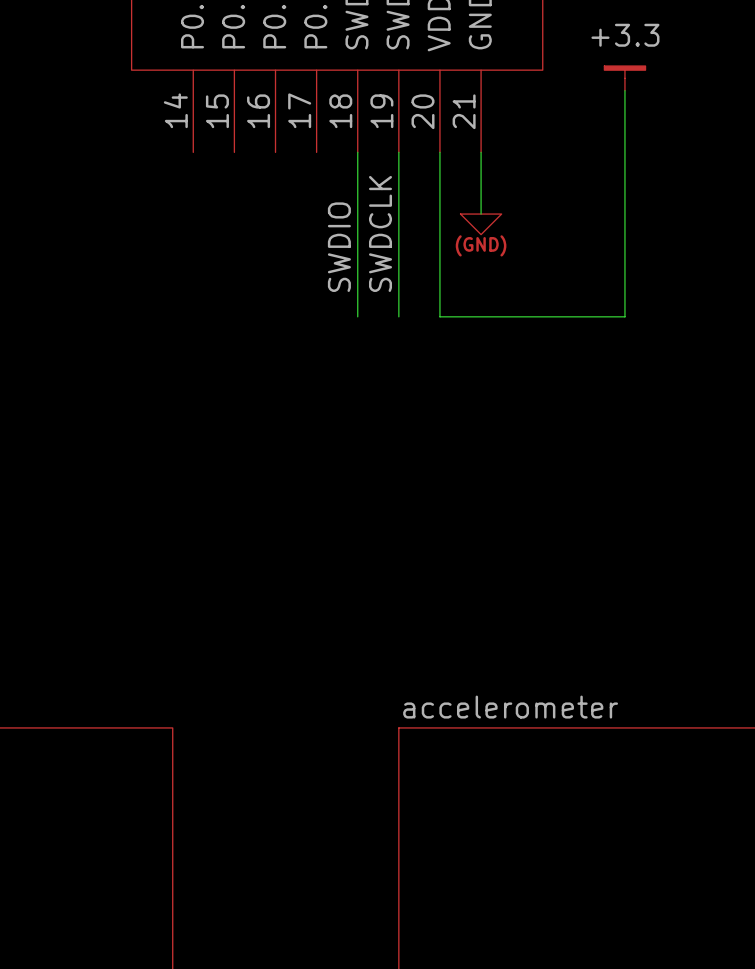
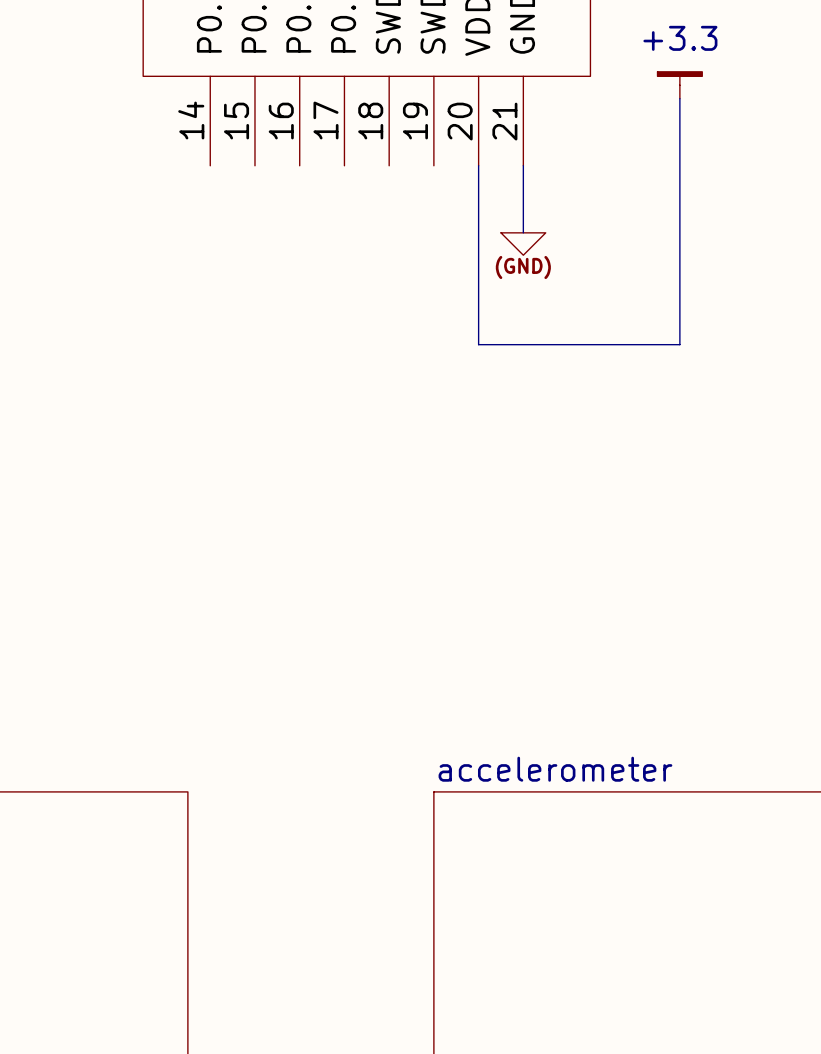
wire: (357, 152) (357, 316) -> none
wire: (398, 152) (398, 316) -> none
label: SWDCLK (380, 233) -> none
label: SWDIO (339, 247) -> none

